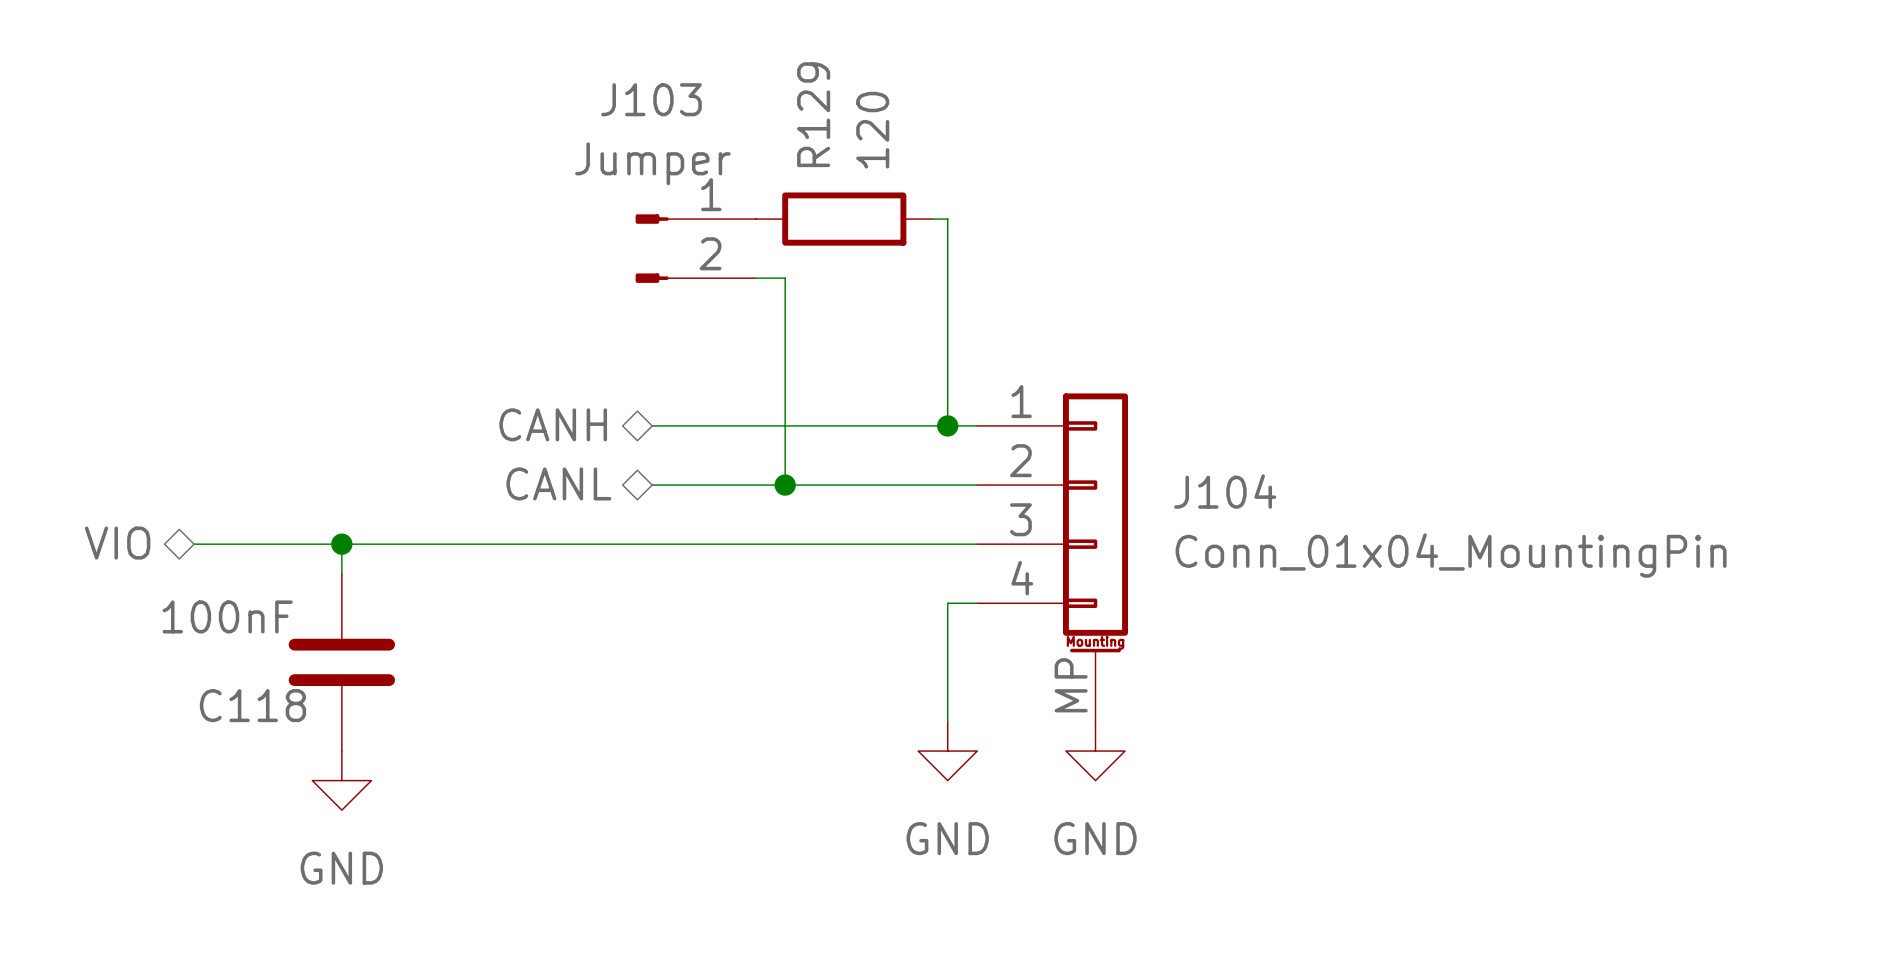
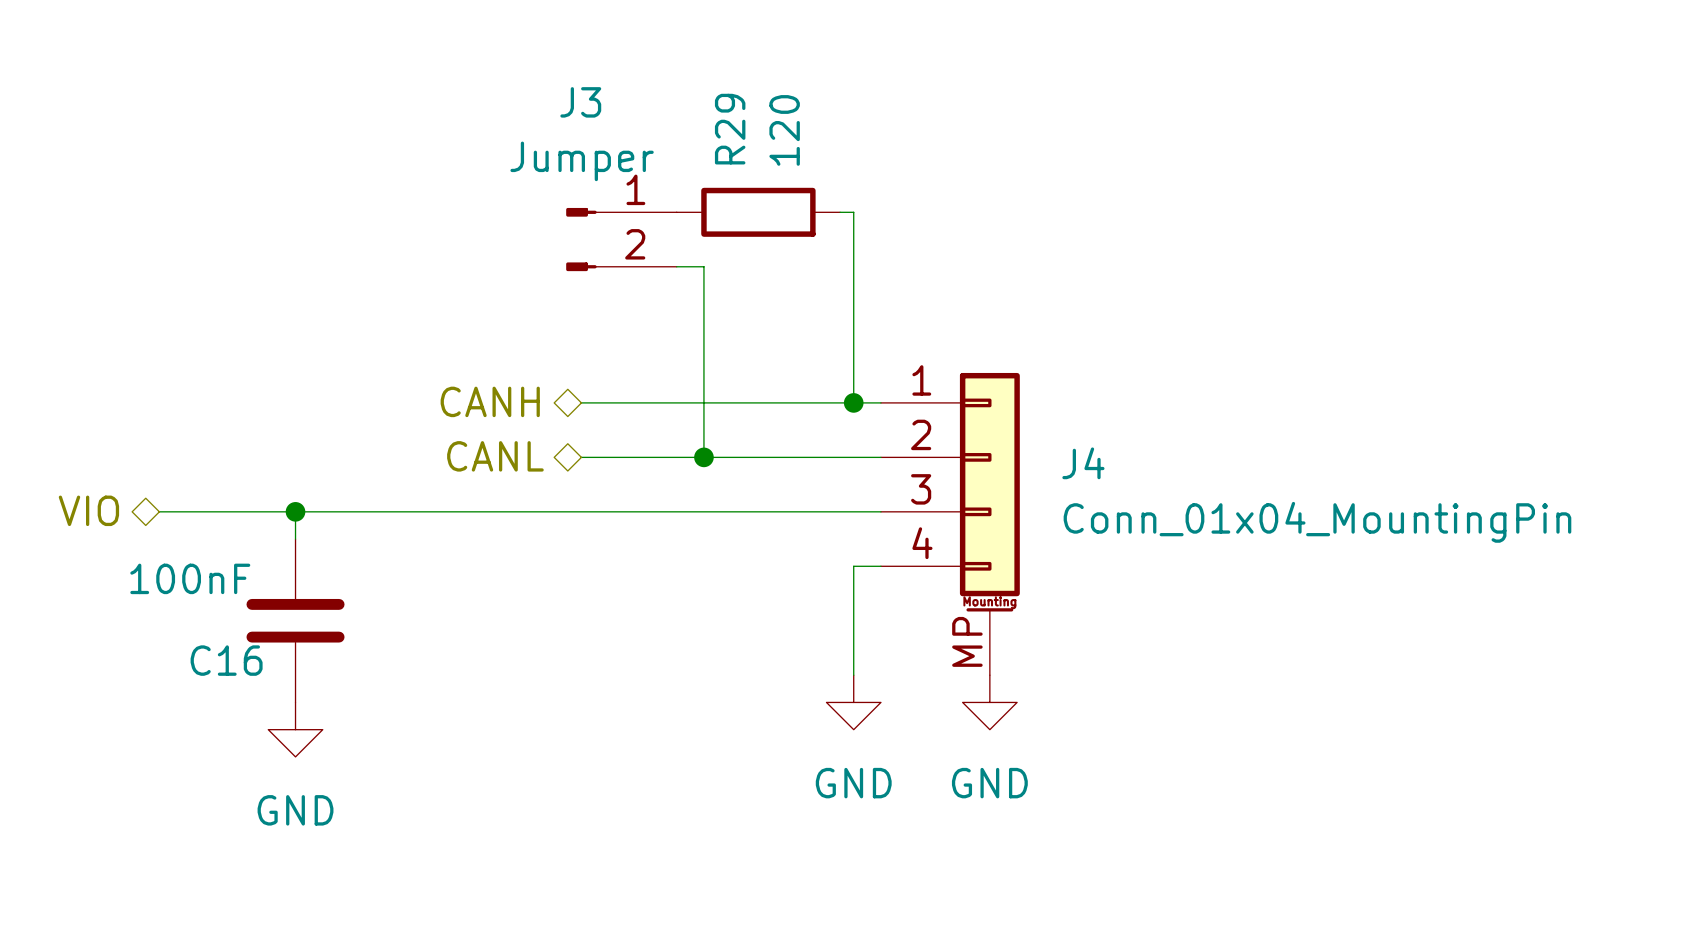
J103 name: J103 (651, 99) -> J3 (580, 102)
R129 name: R129 (813, 114) -> R29 (730, 129)
J104 name: J104 (1225, 491) -> J4 (1083, 463)
C118 name: C118 (252, 705) -> C16 (226, 660)

